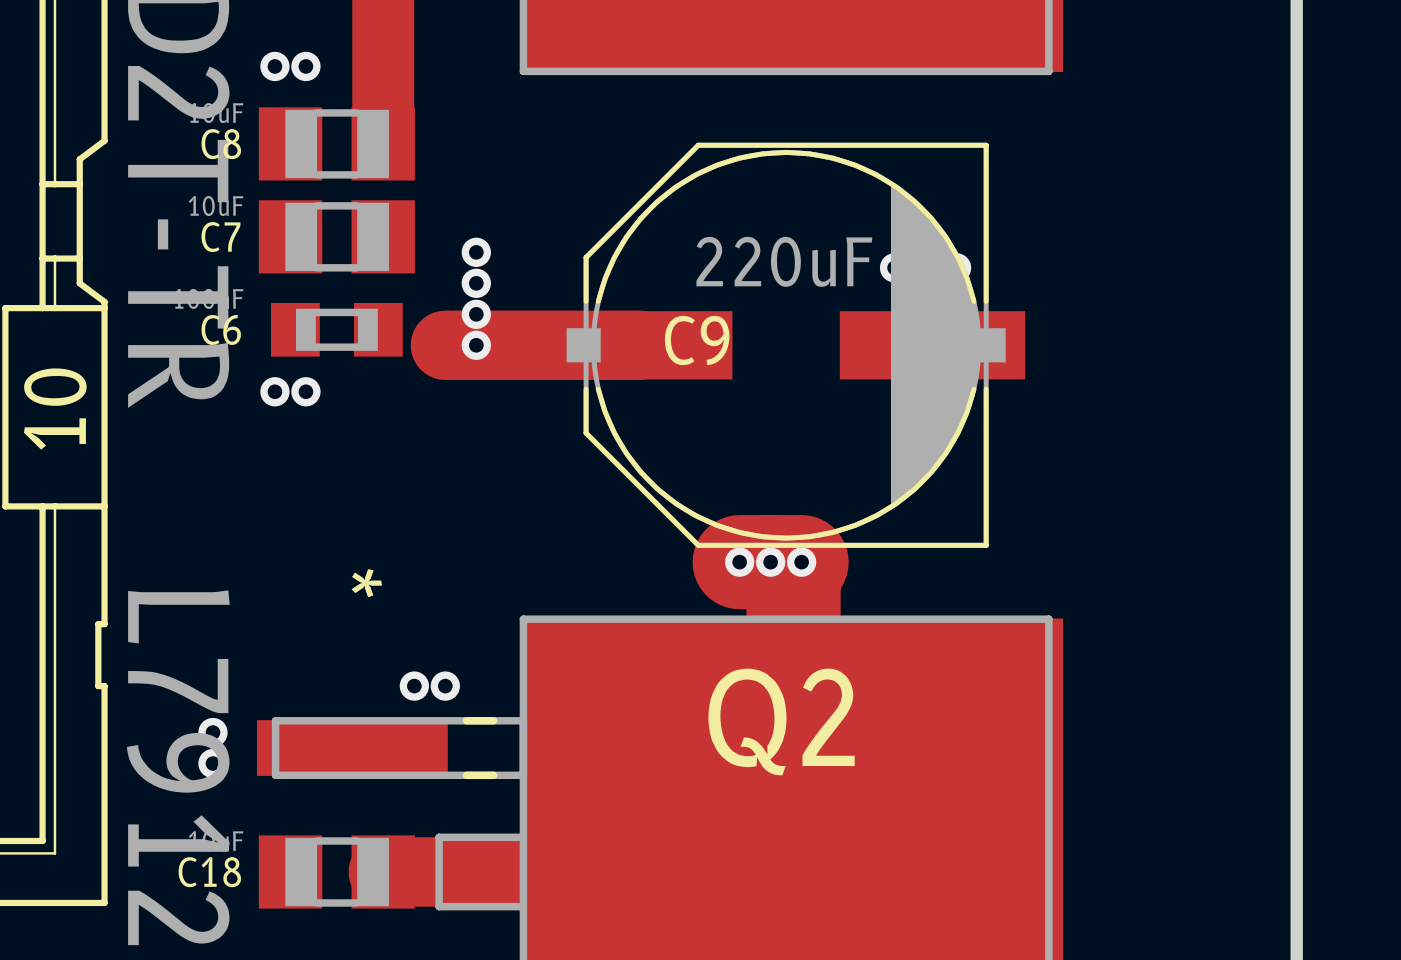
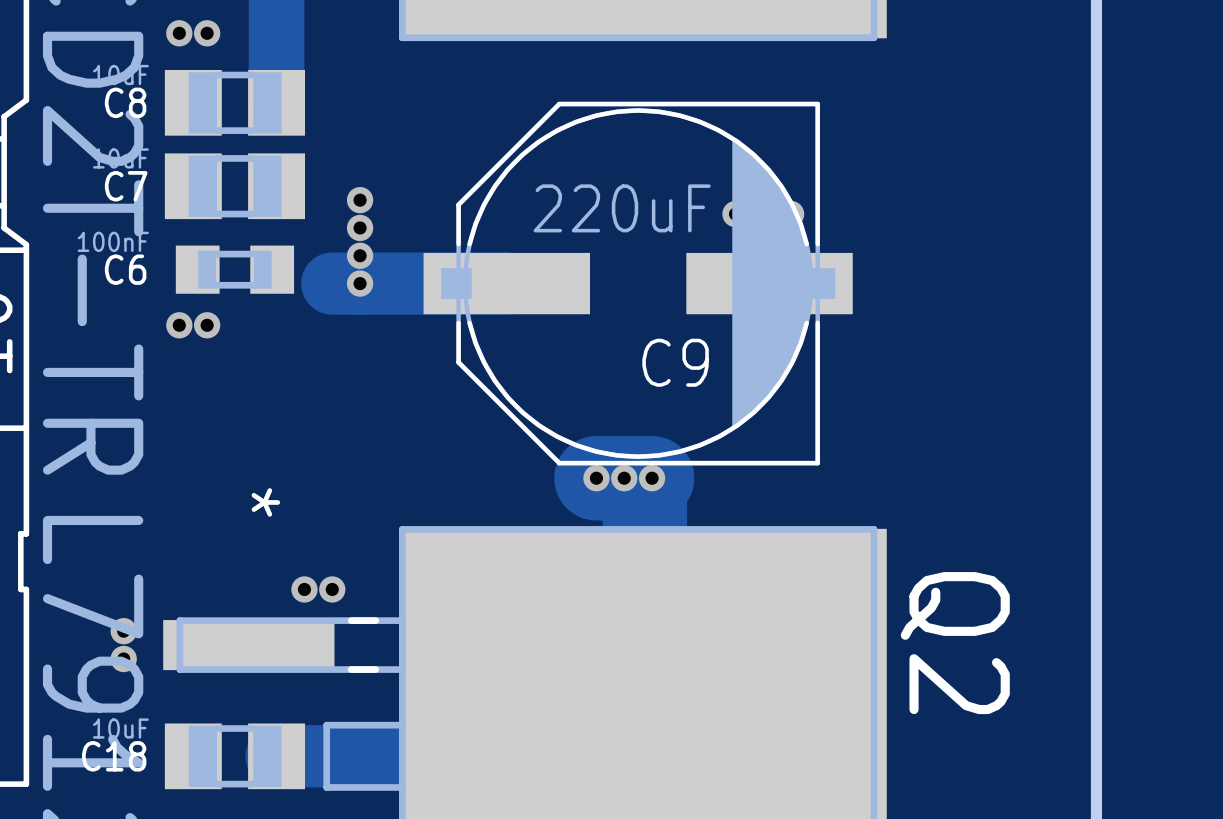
C9 name position: C9 (697, 340) -> C9 (675, 362)
Q2 name rotation: 0° (781, 721) -> 90° clockwise (955, 643)
Q2 name position: Q2 (781, 721) -> Q2 (955, 643)

